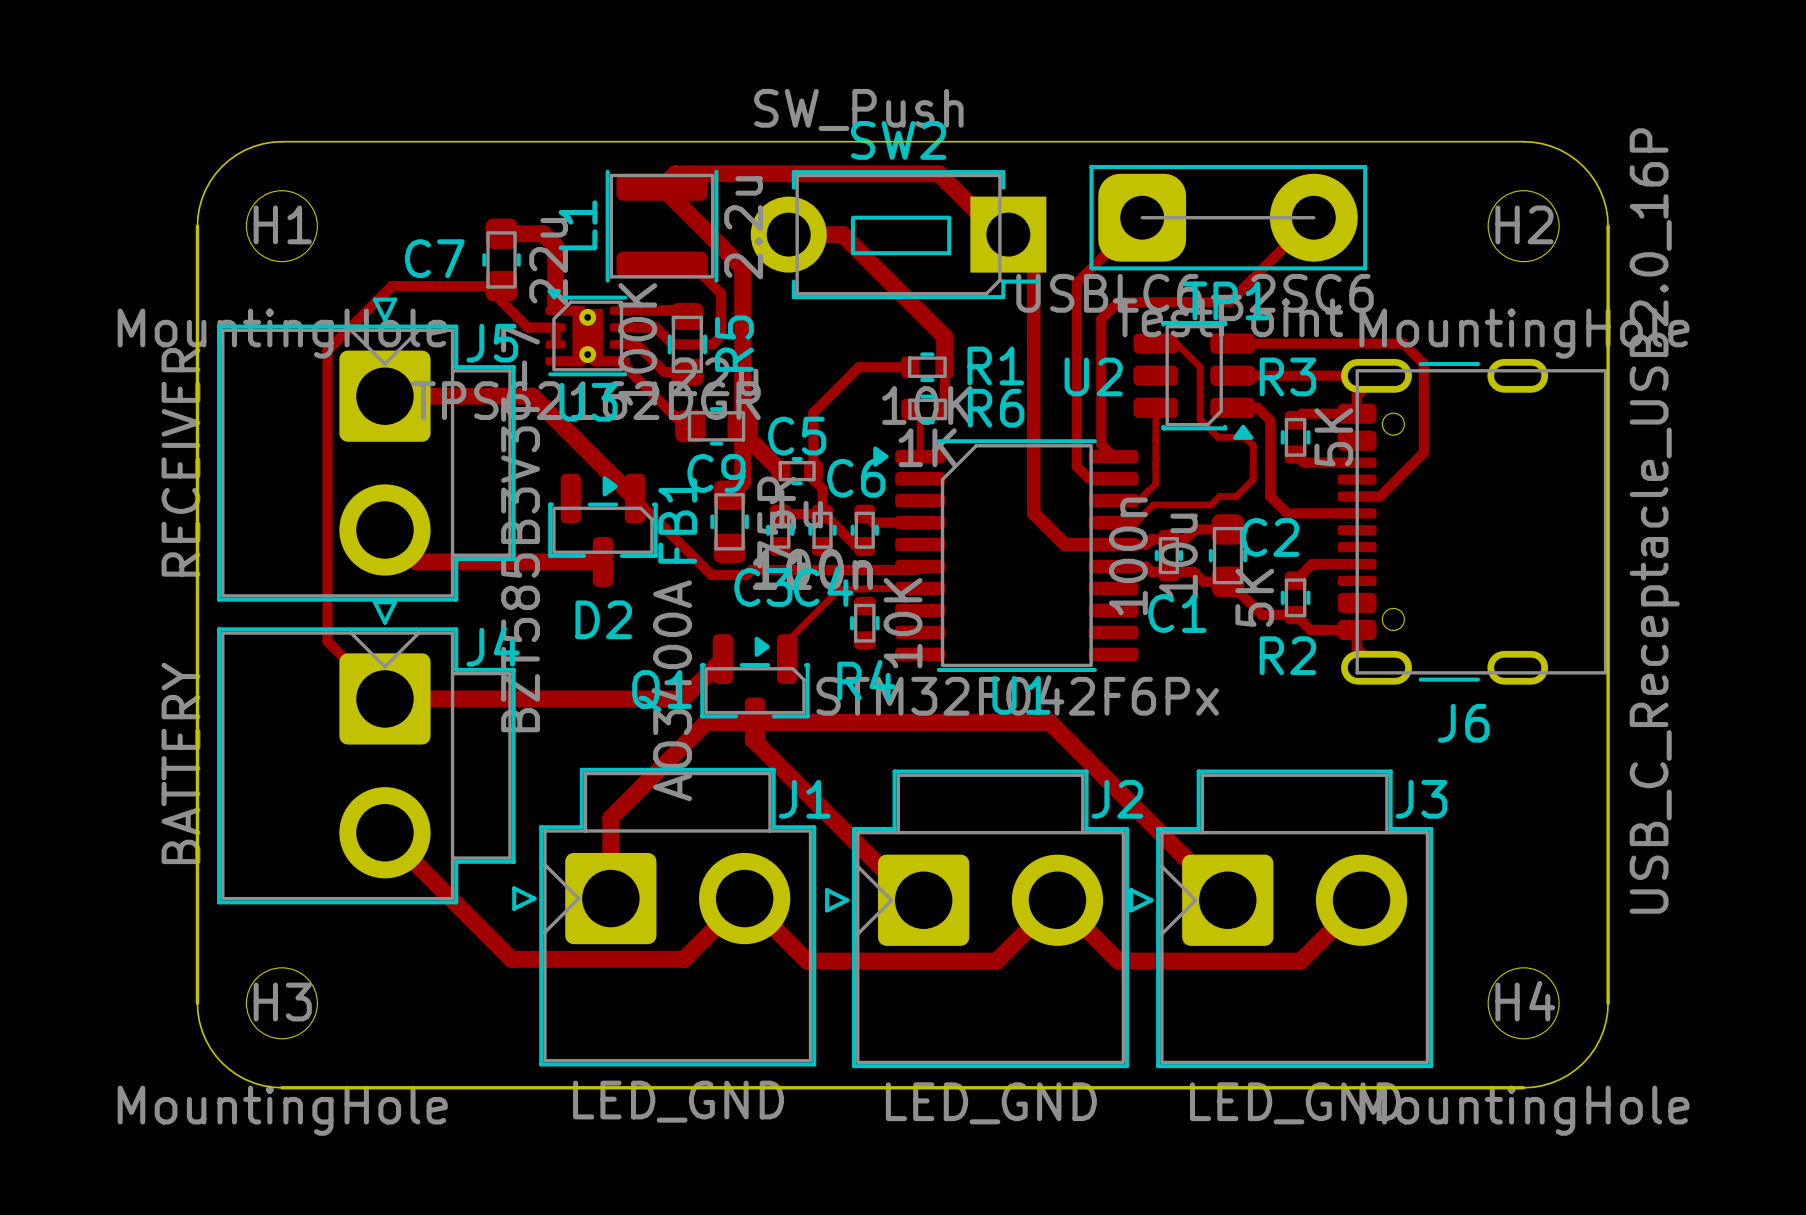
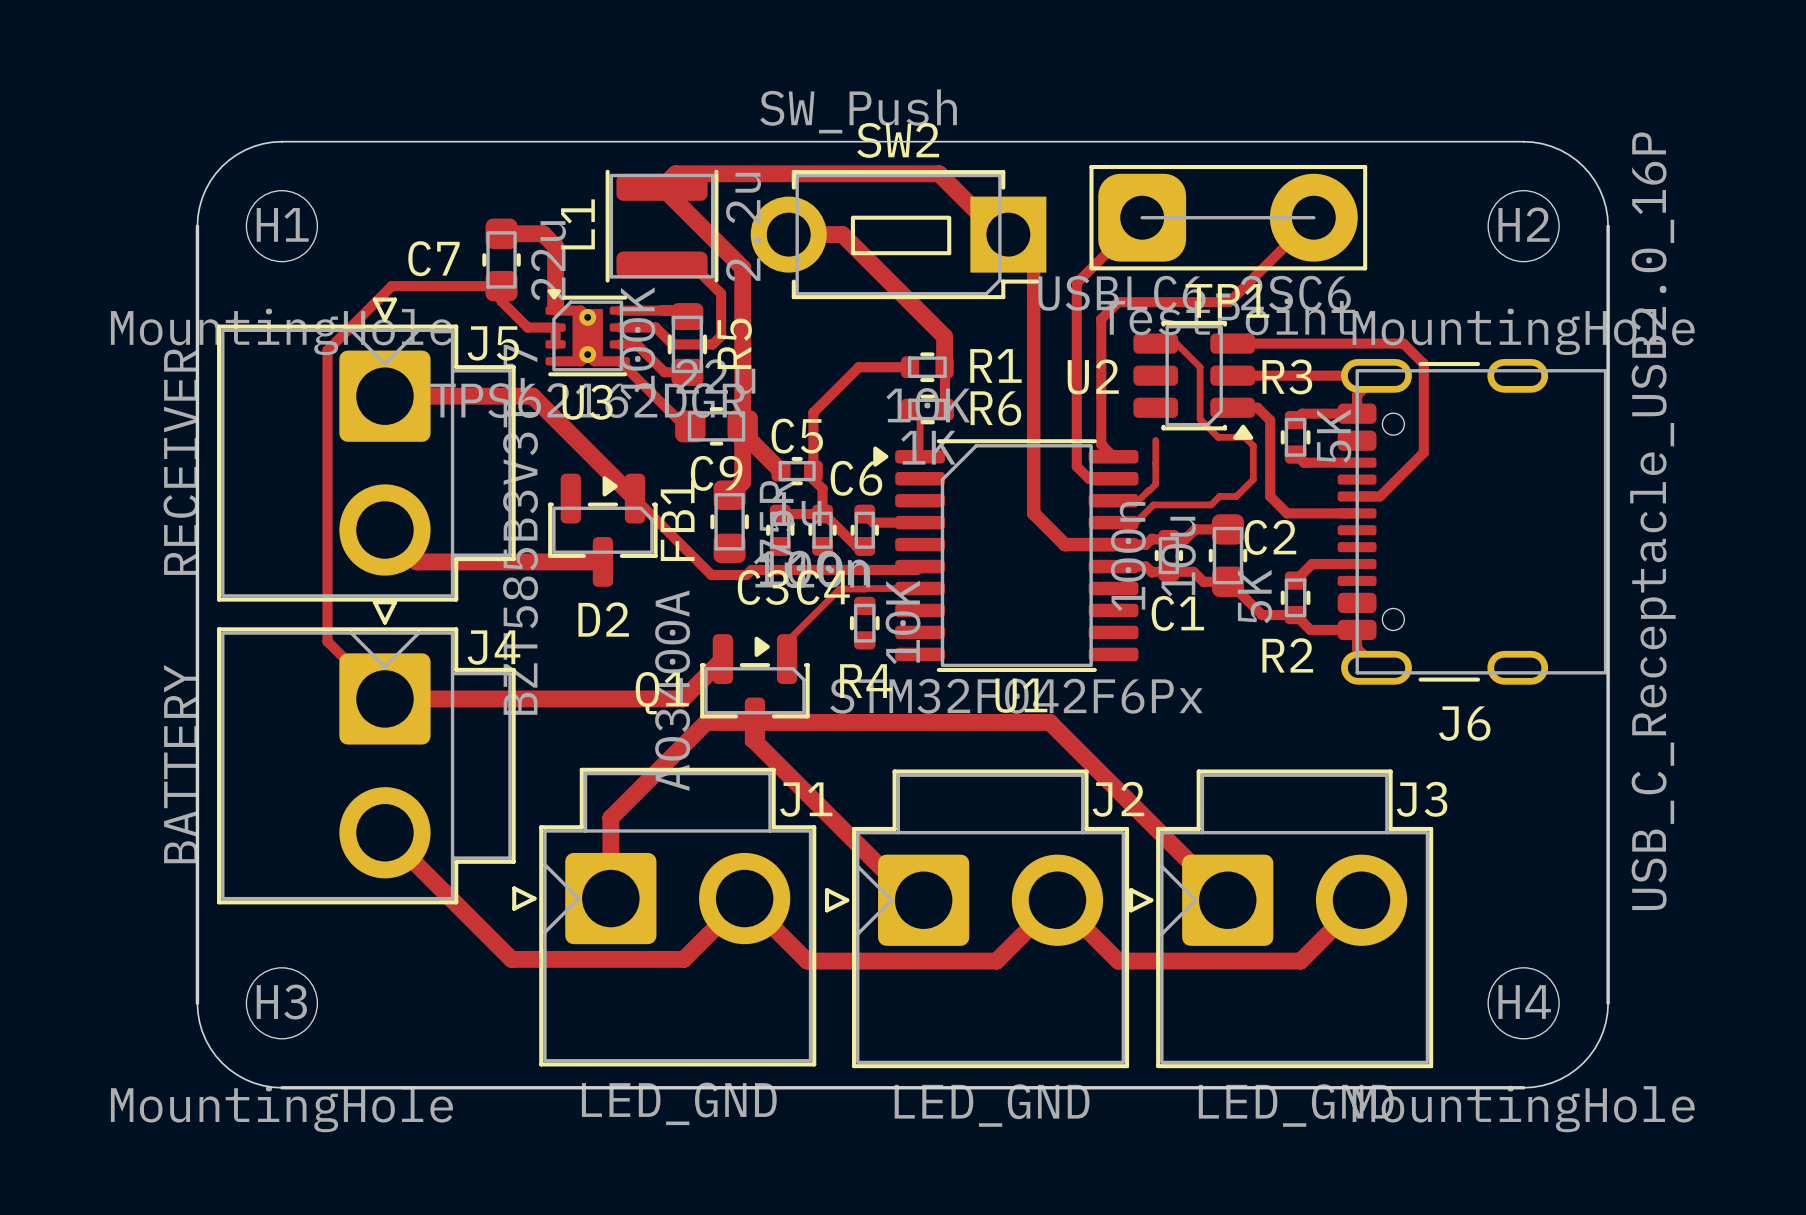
track: (1155, 407) (1155, 440) -> none

